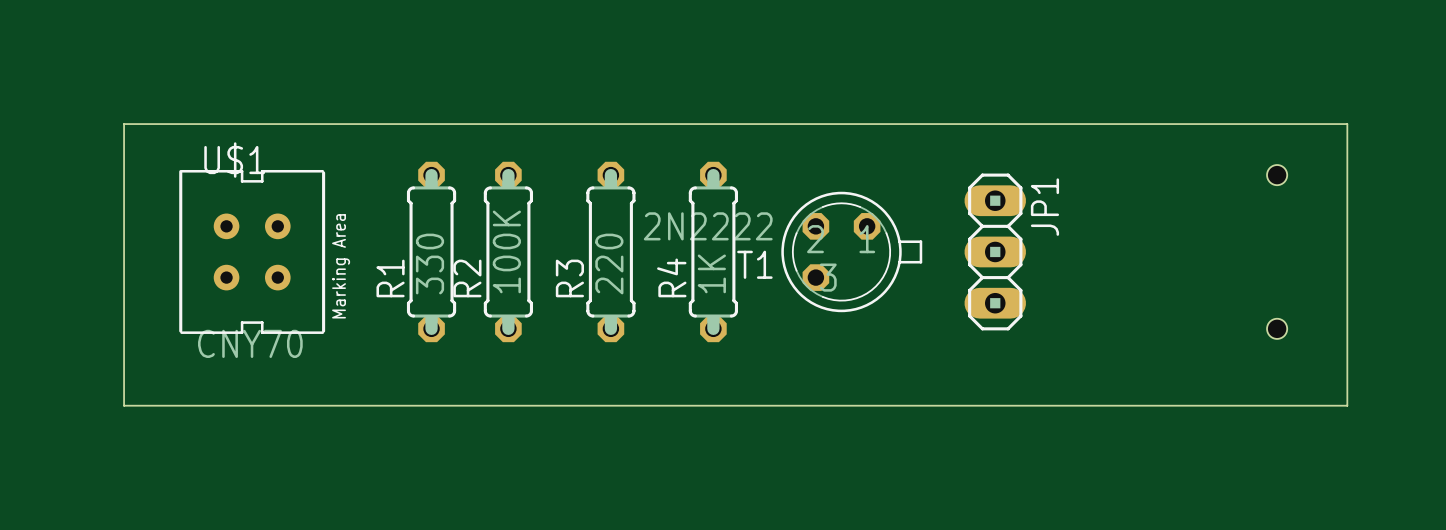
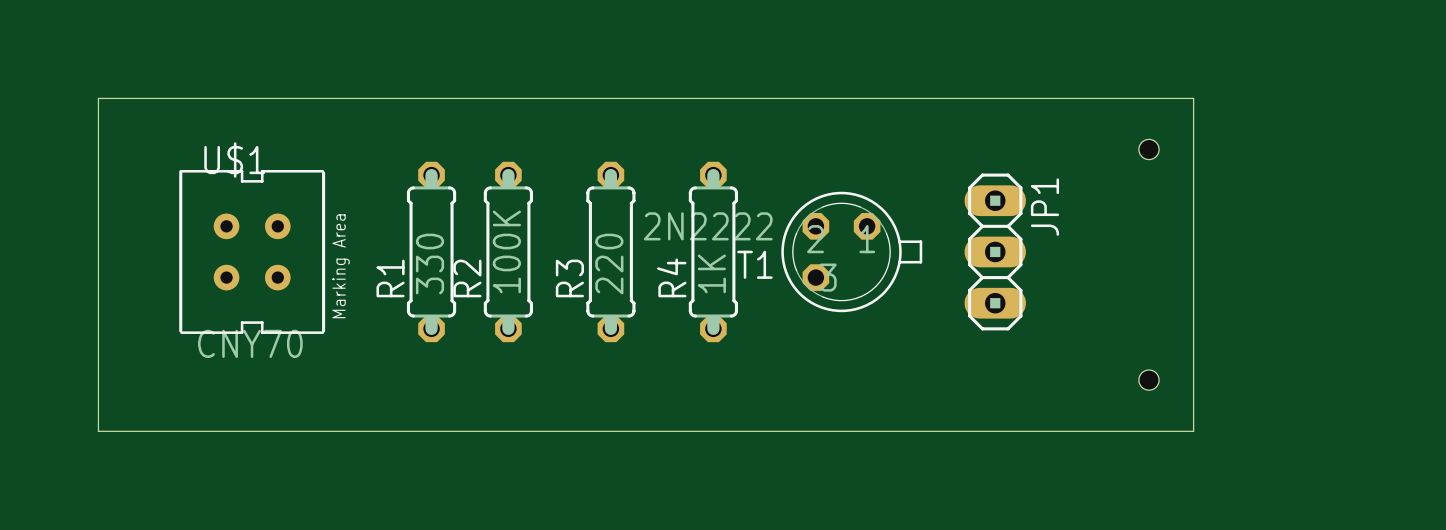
board edge: (124, 124) (1347, 124) (1347, 405) (124, 405) (124, 124) -> (98, 98) (98, 431) (1193, 431) (1193, 98) (98, 98)
hole: none -> (1149, 149)
hole: (1277, 175) -> none
hole: (1277, 328) -> none
hole: none -> (1149, 380)

